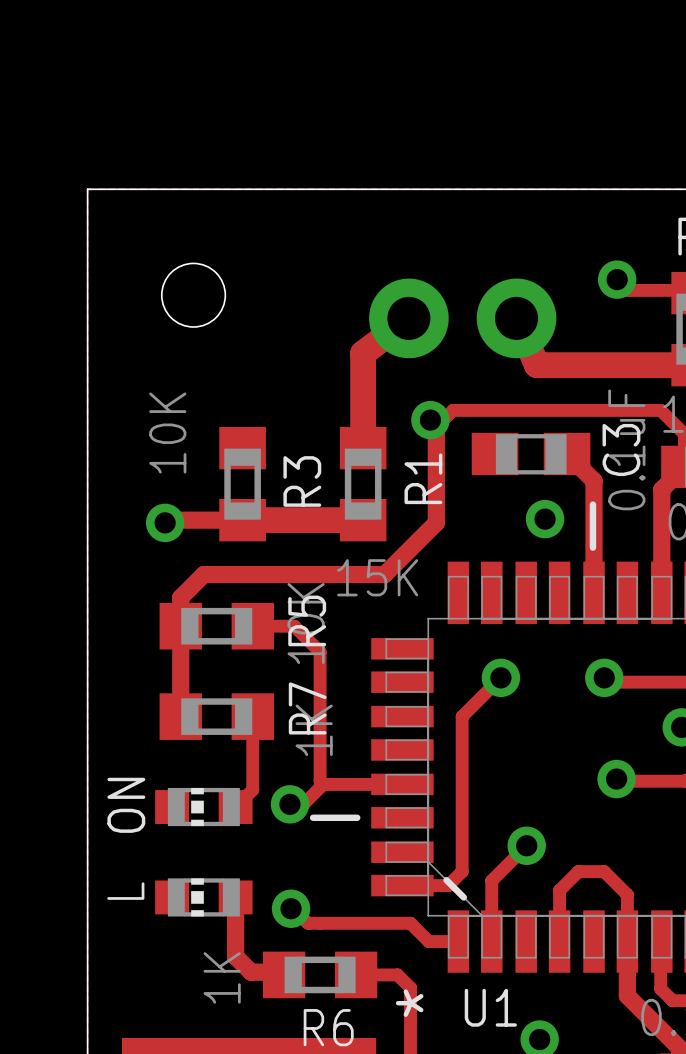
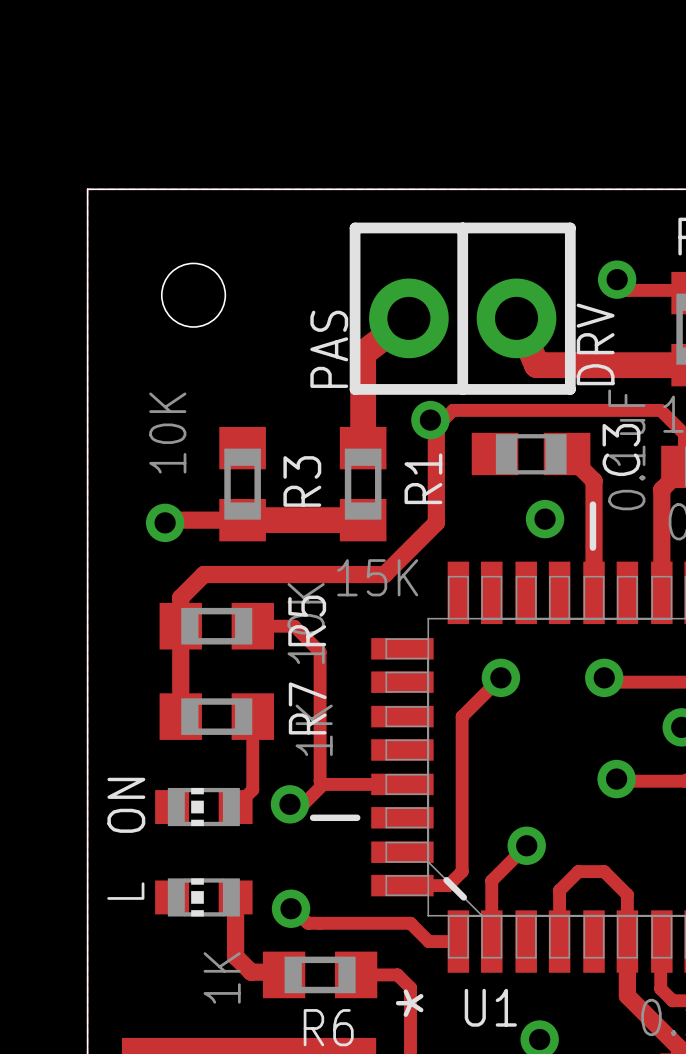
line: none -> (355, 227) (570, 227) (570, 389) (355, 389) (355, 227)
line: none -> (462, 227) (462, 389)
text: none -> DRV (595, 344)
text: none -> PAS (329, 349)

